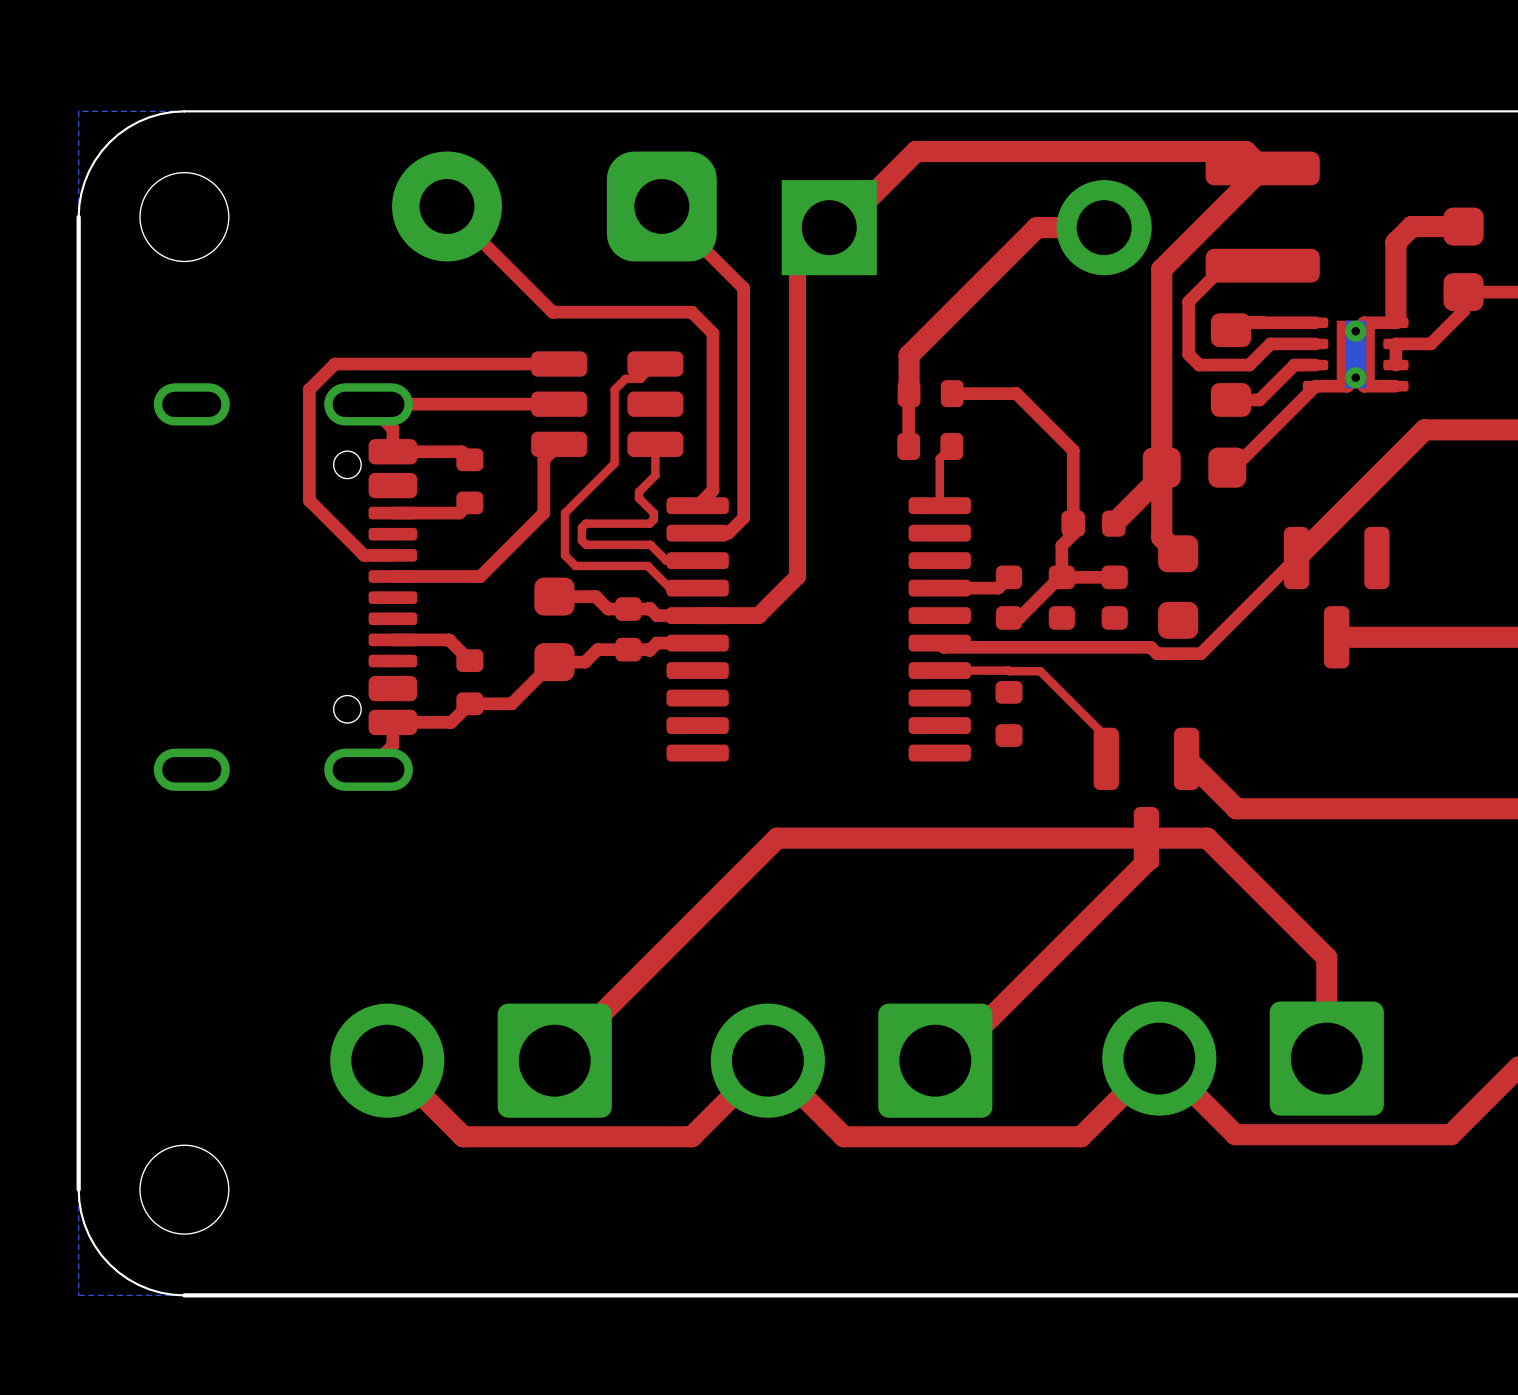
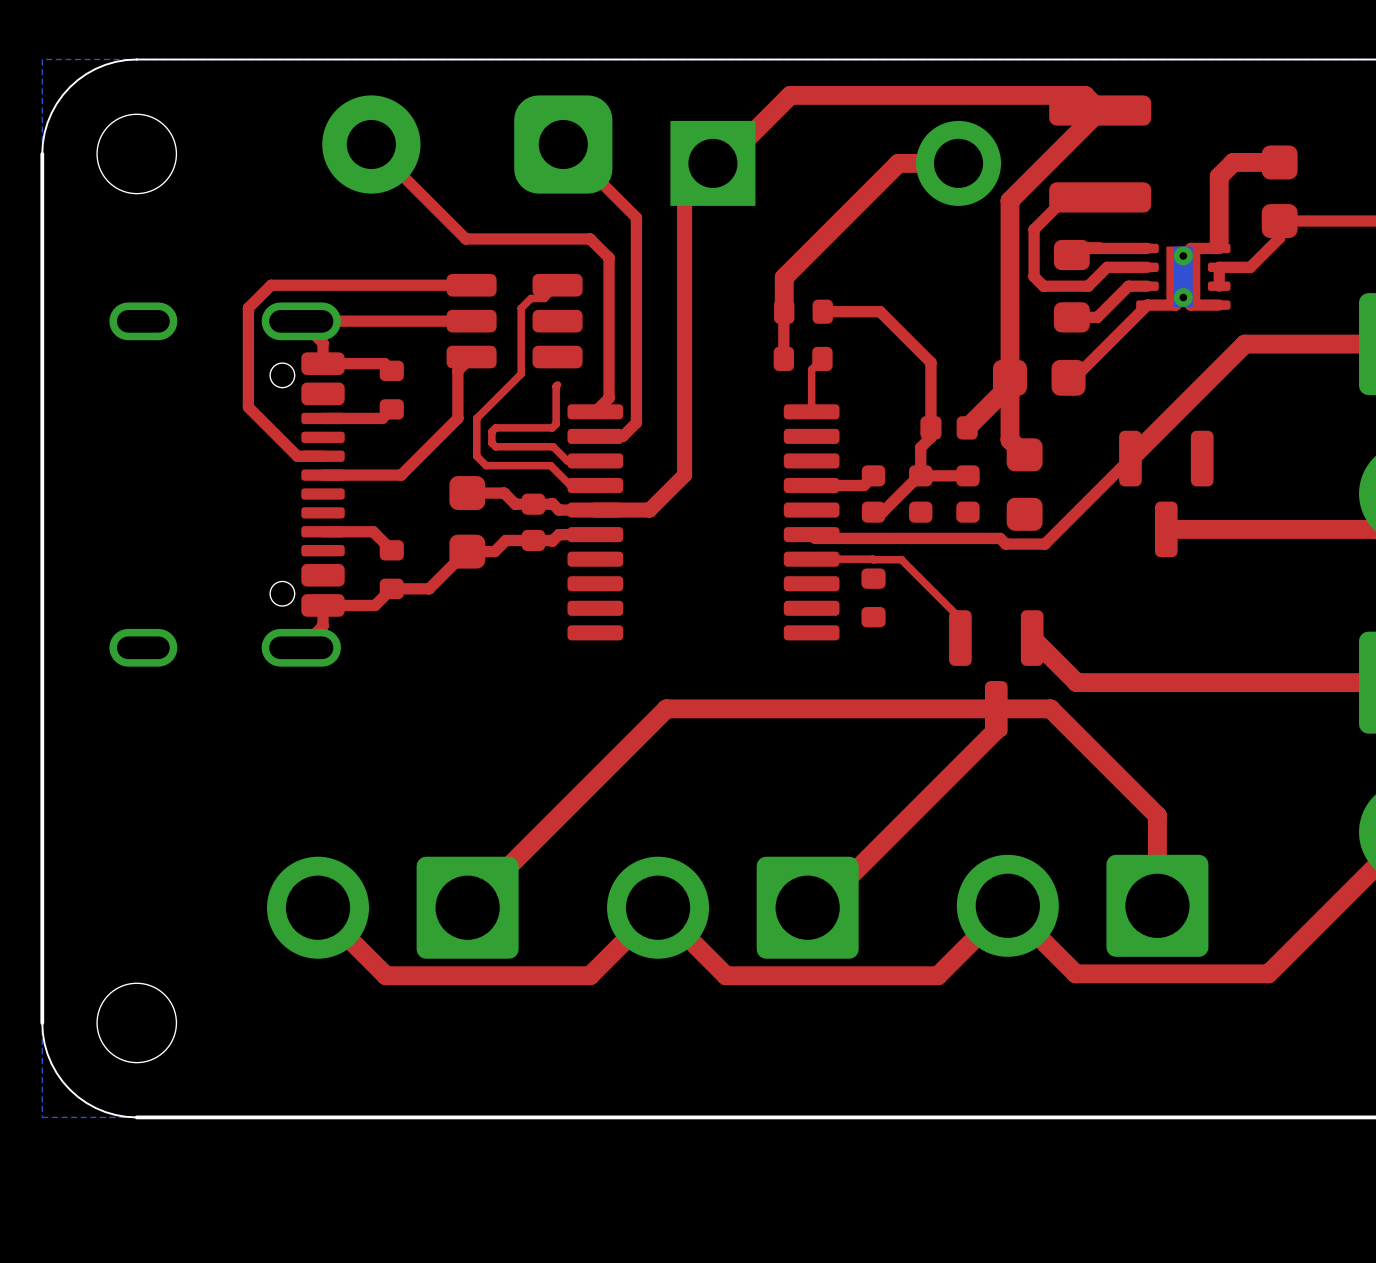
top track: (655, 444) (655, 475) -> none
top track: (653, 477) (638, 491) (638, 498) (653, 513) -> (556, 386) (556, 418)

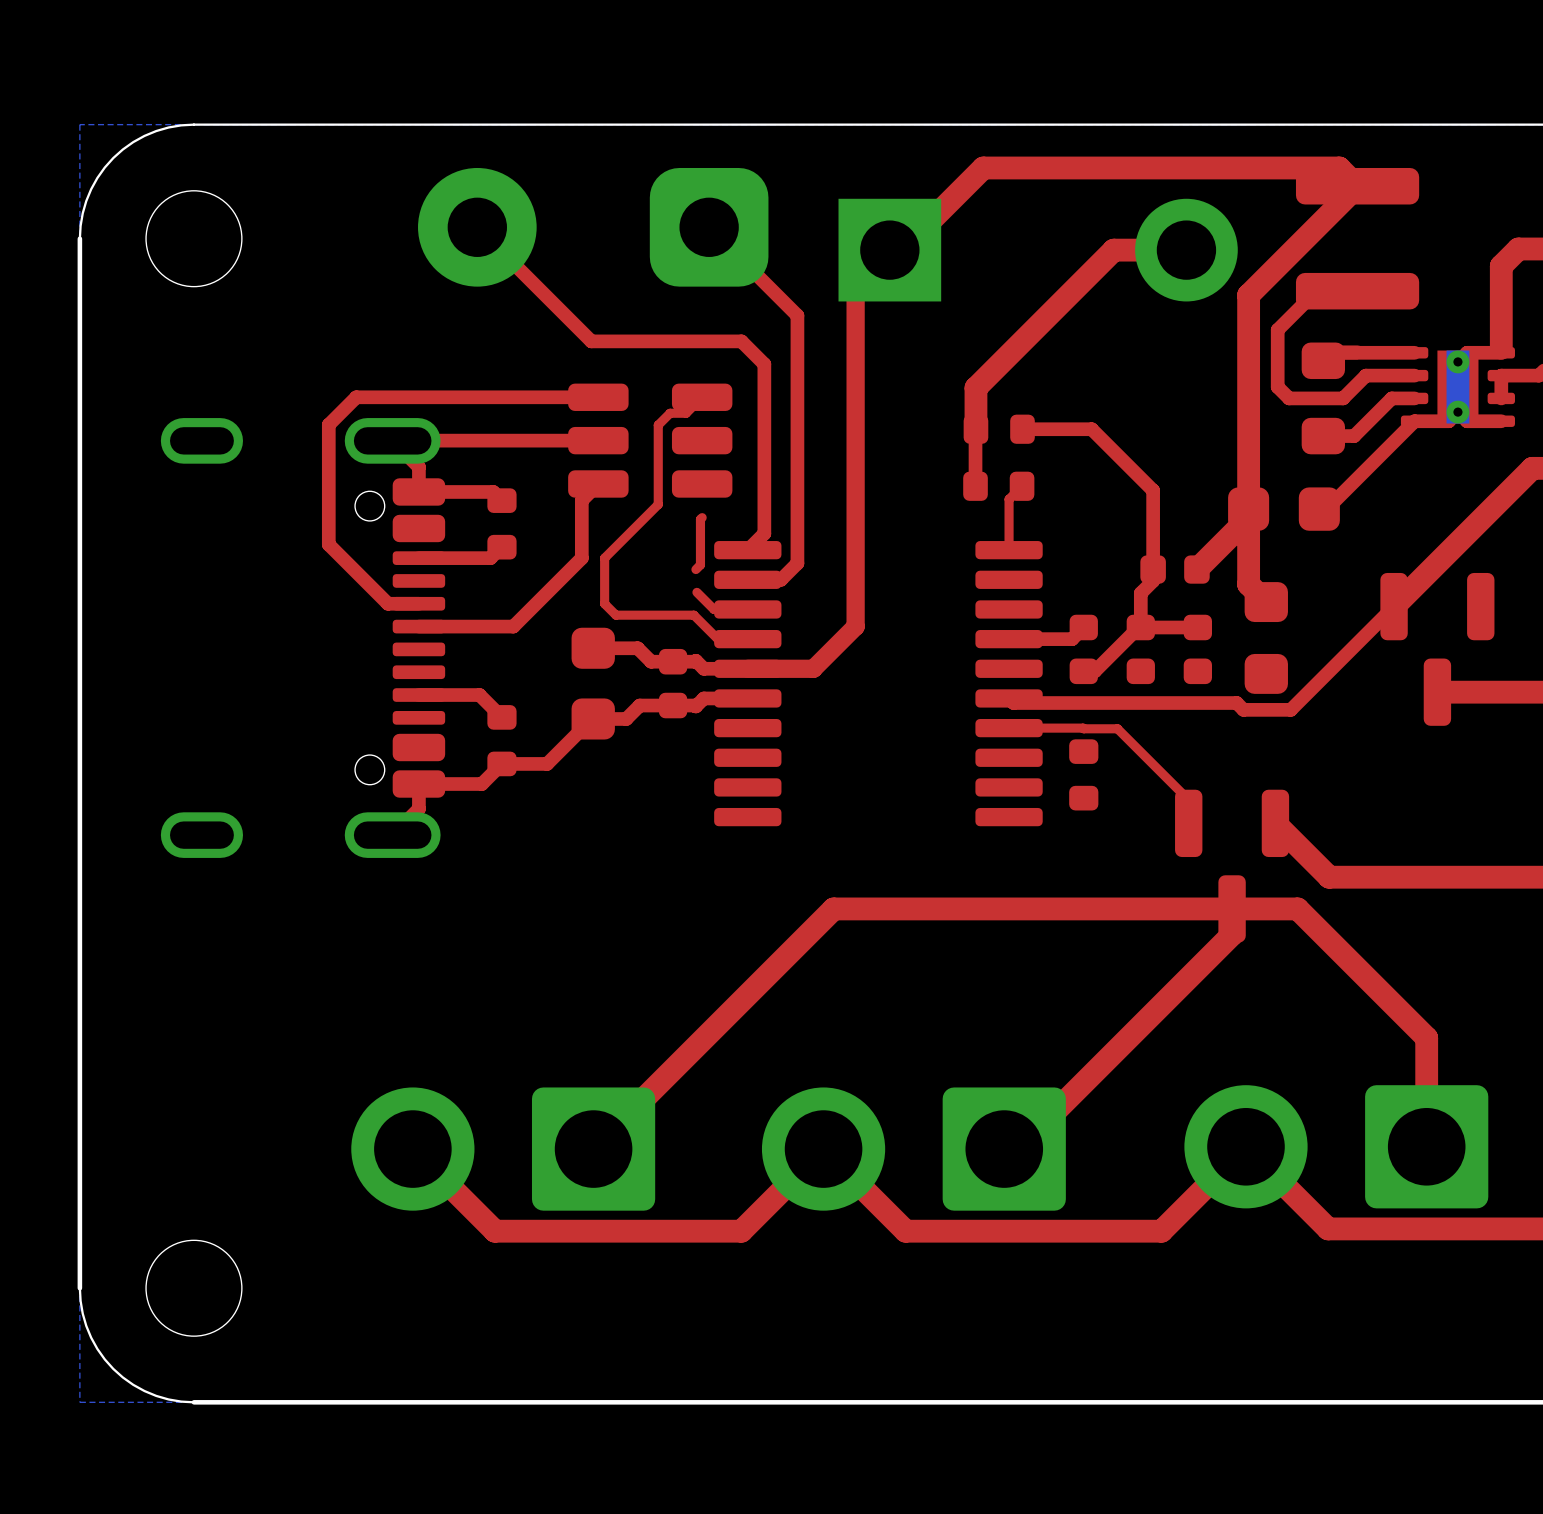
top track: (552, 427) (495, 427) (491, 431) (491, 442) (495, 446) (553, 446) -> none

